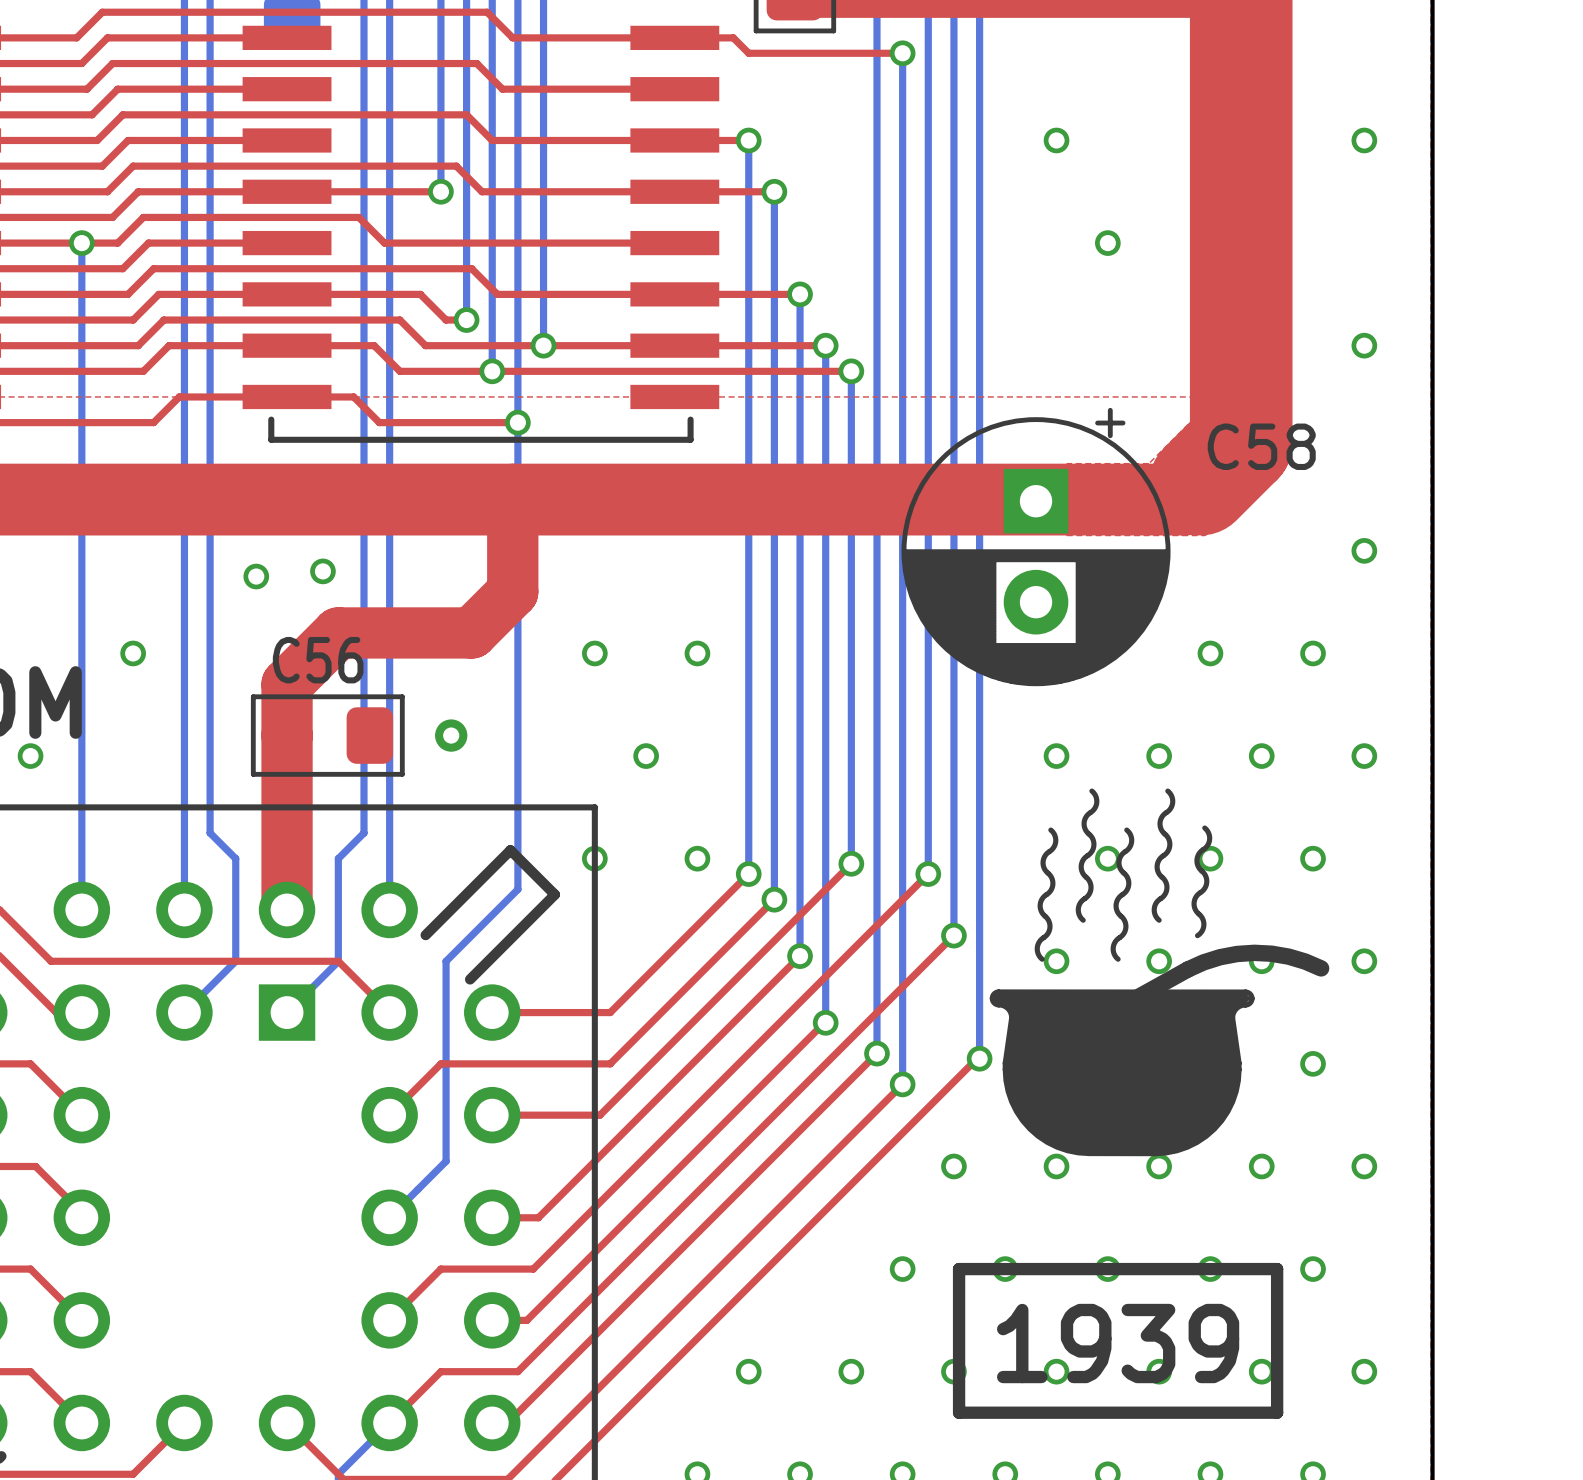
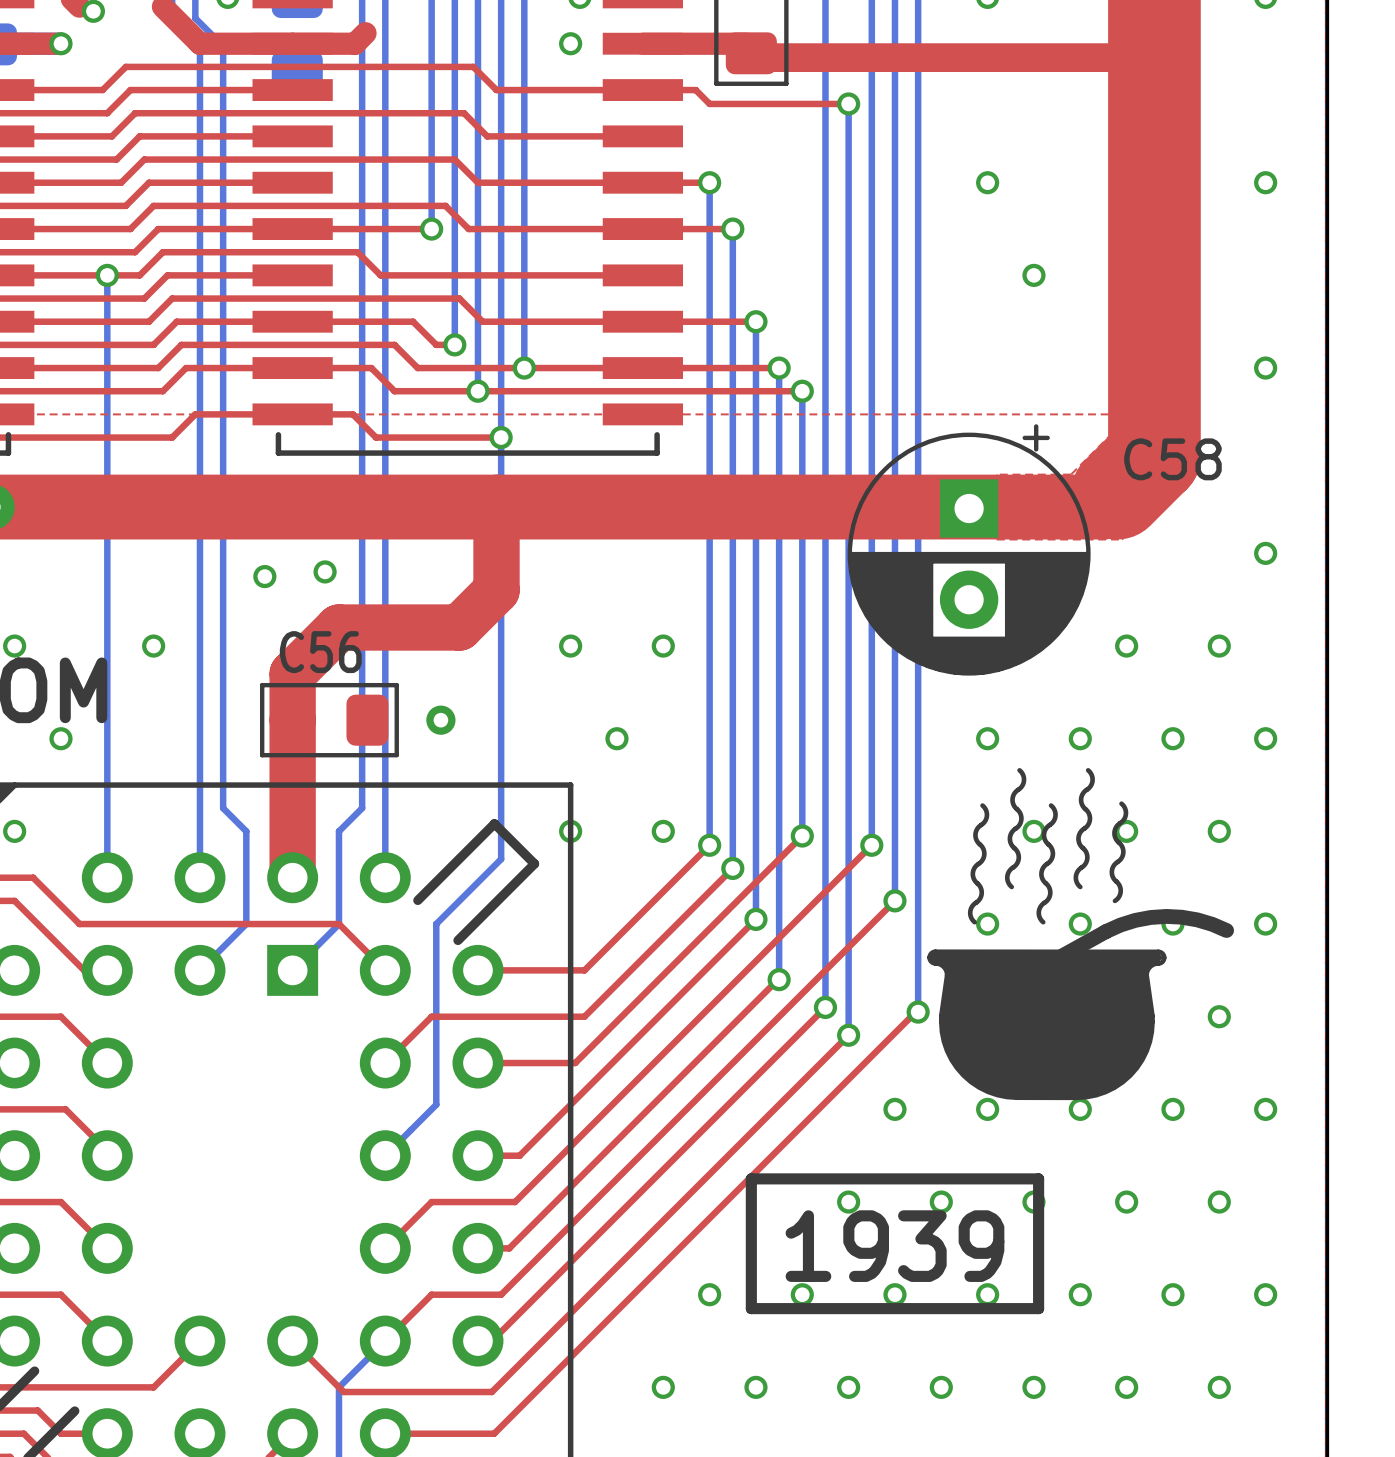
line: (959, 1269) (959, 1412) (1277, 1412) (1277, 1269) (959, 1269) -> (751, 1178) (751, 1308) (1038, 1308) (1038, 1178) (751, 1178)
text position: 1939 (1118, 1343) -> 1939 (894, 1246)

